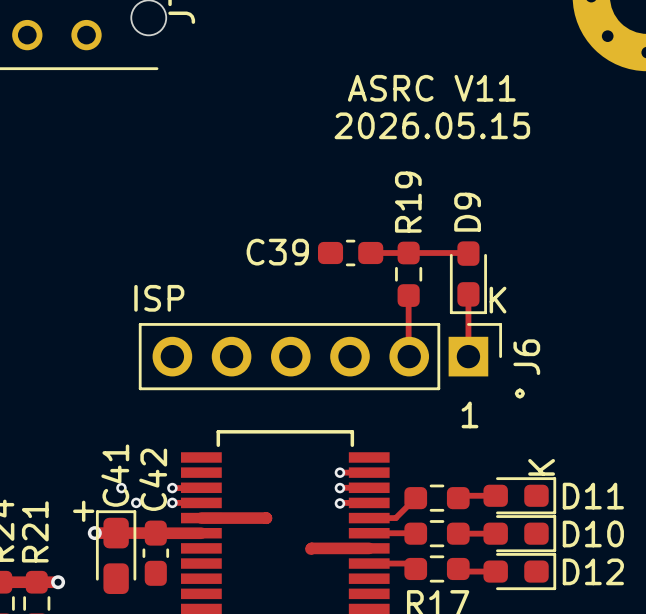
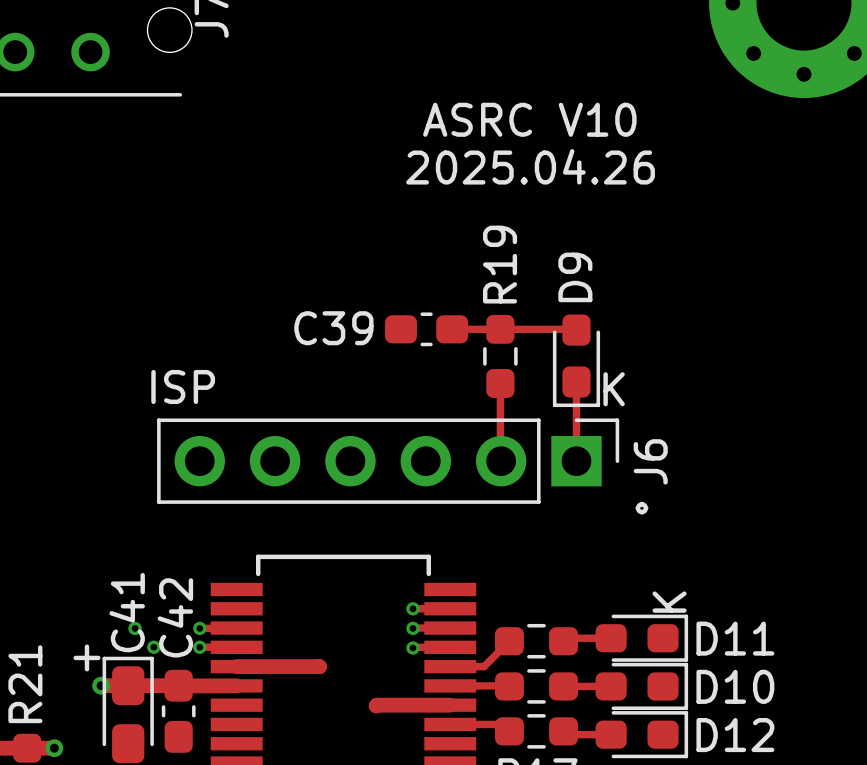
text: ASRC V11 (431, 88) -> ASRC V10 (529, 119)
text: 2026.05.15 (432, 125) -> 2025.04.26 (530, 166)
text: 1 (470, 414) -> none

